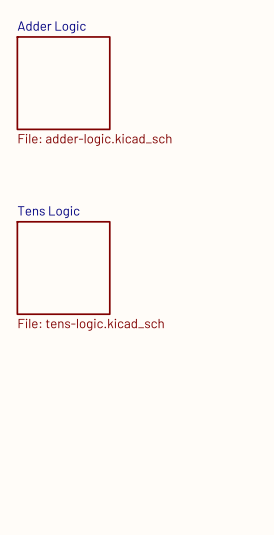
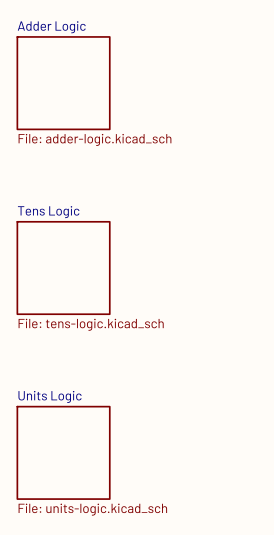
sheet Units Logic: none -> File: units-logic.kicad_sch (63, 452)

